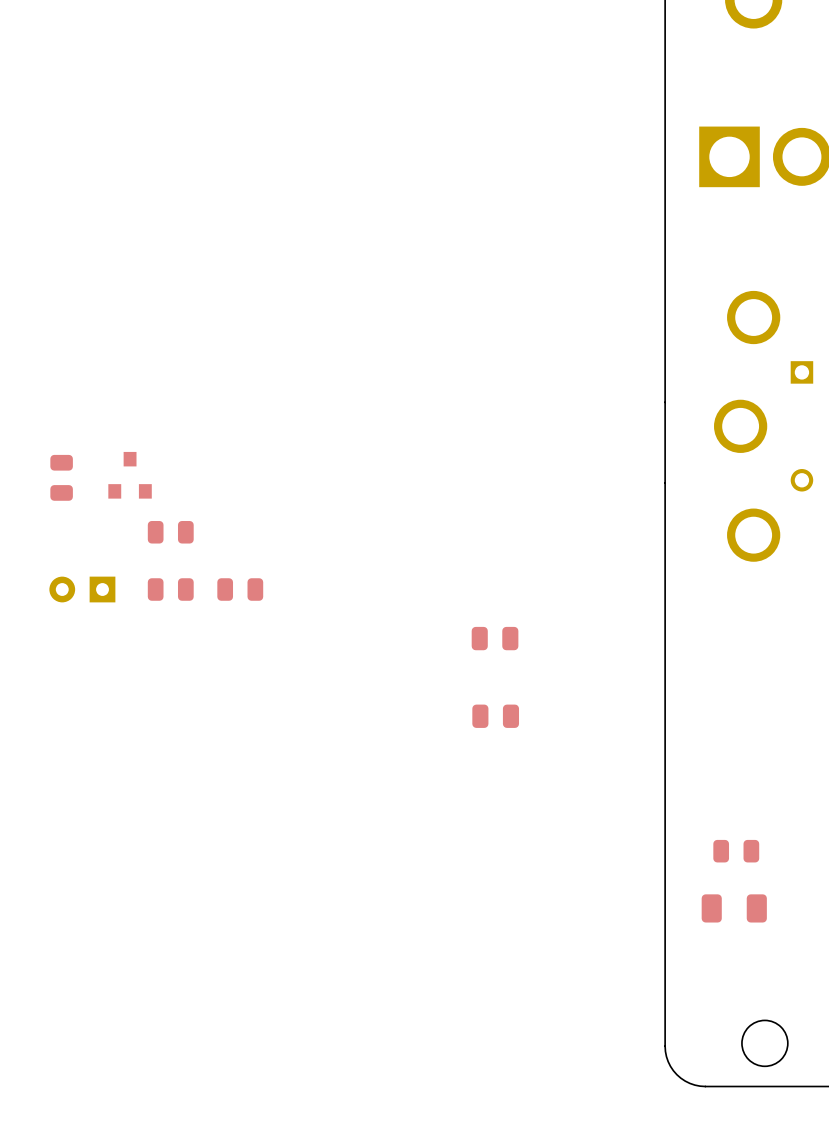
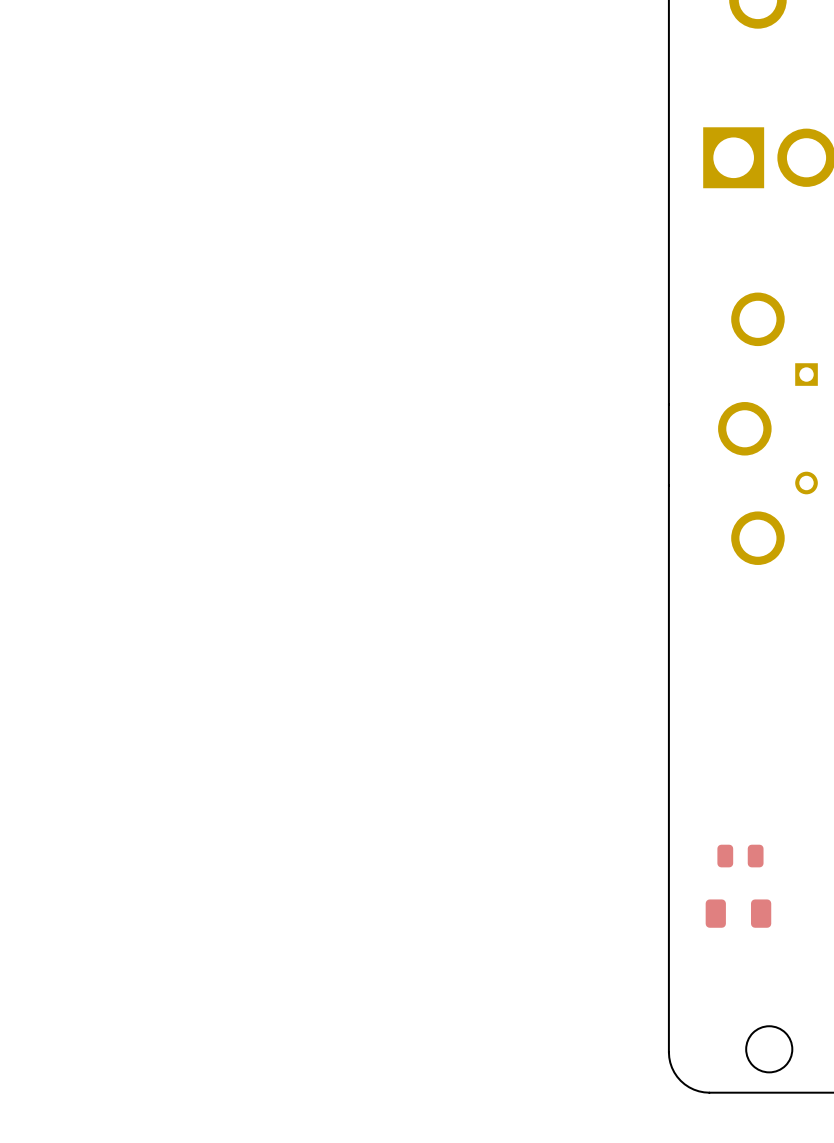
part: (130, 475) -> none
part: (61, 477) -> none
part: (170, 532) -> none
part: (82, 589) -> none
part: (170, 589) -> none
part: (240, 589) -> none
part: (495, 638) -> none
part: (495, 716) -> none

